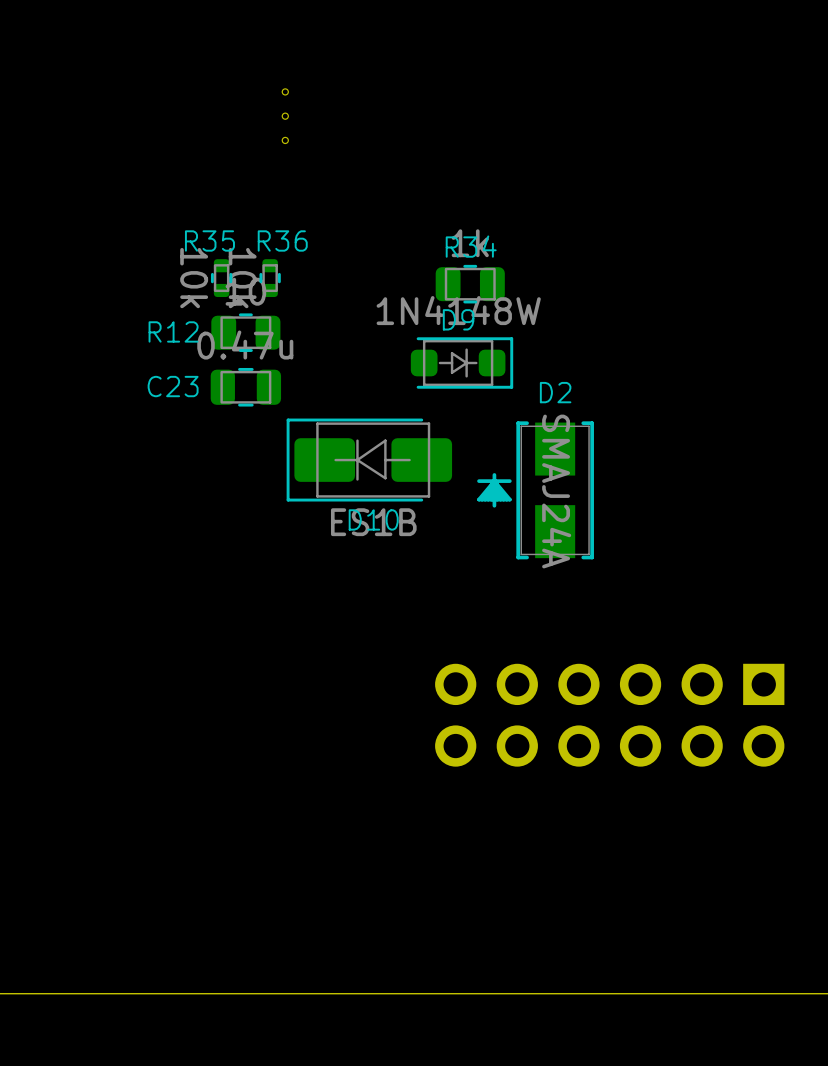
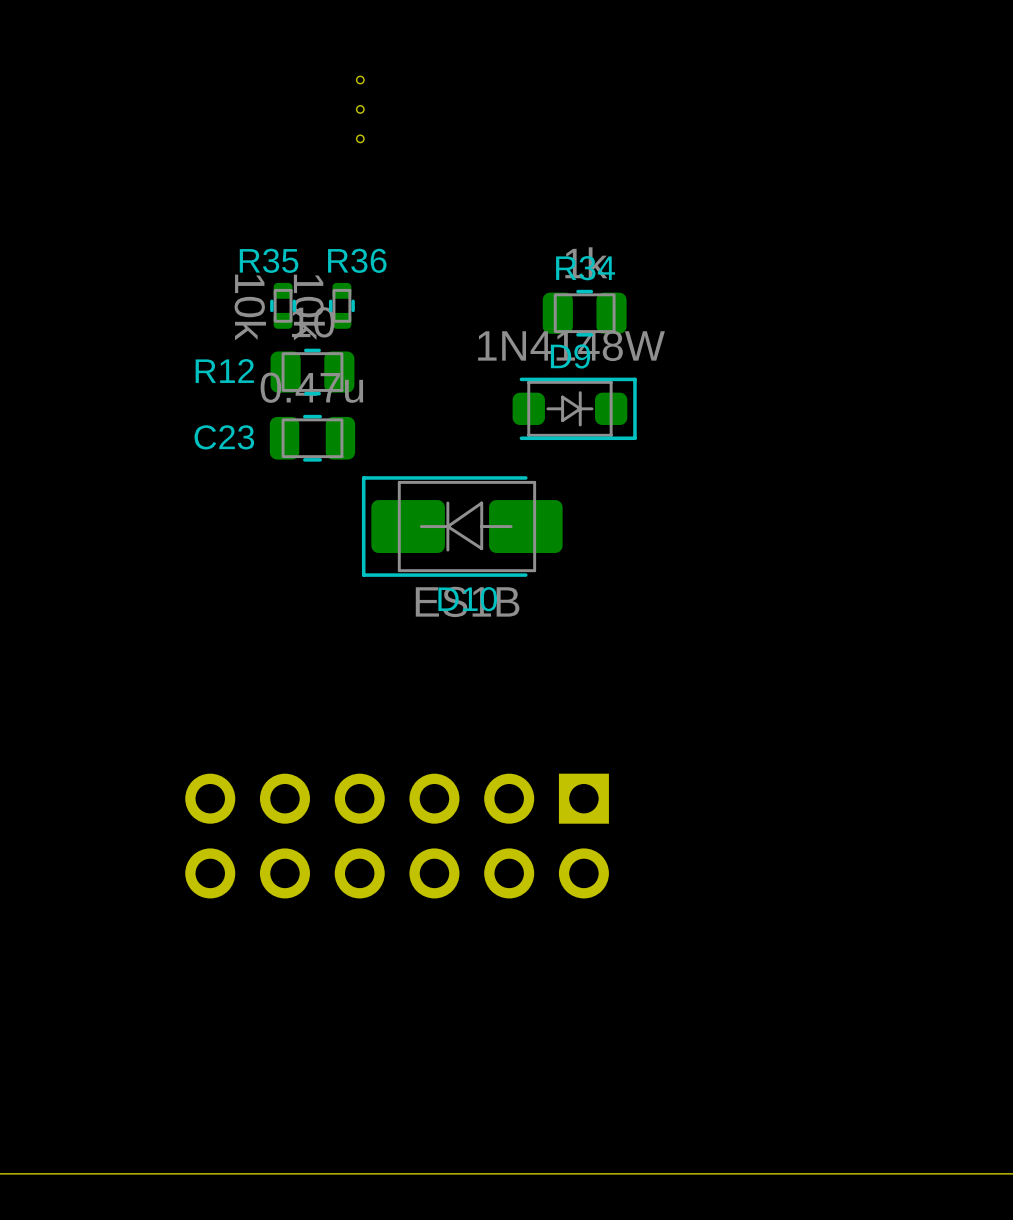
D2: SMAJ24A (535, 490) -> none
part position: (609, 715) -> (397, 836)

